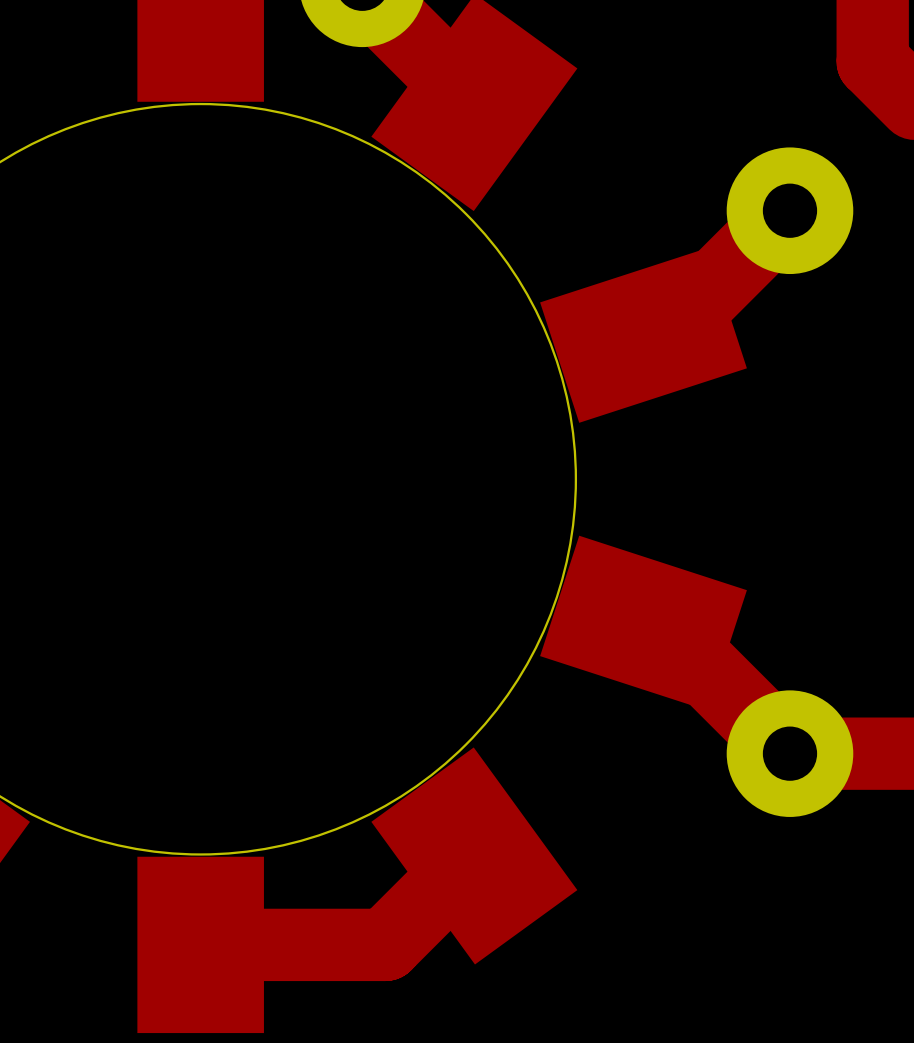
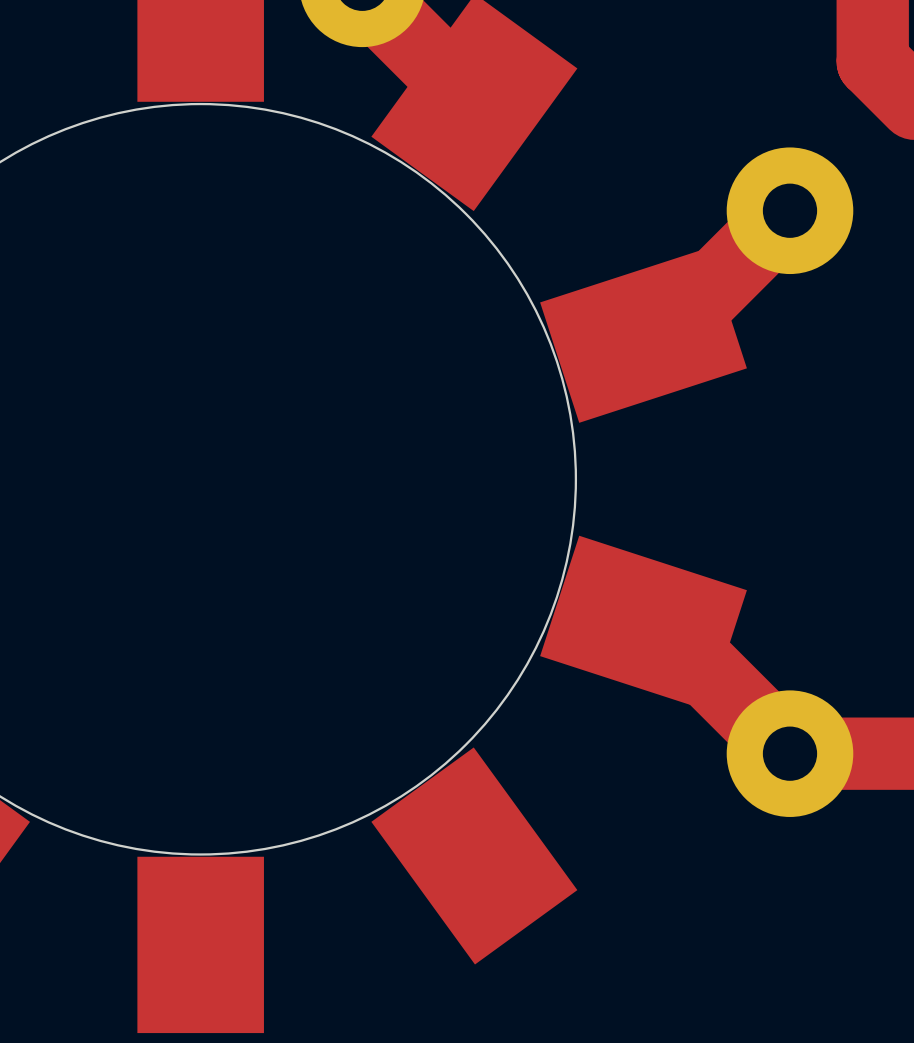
top track: (474, 855) (385, 944) (200, 944) -> none

